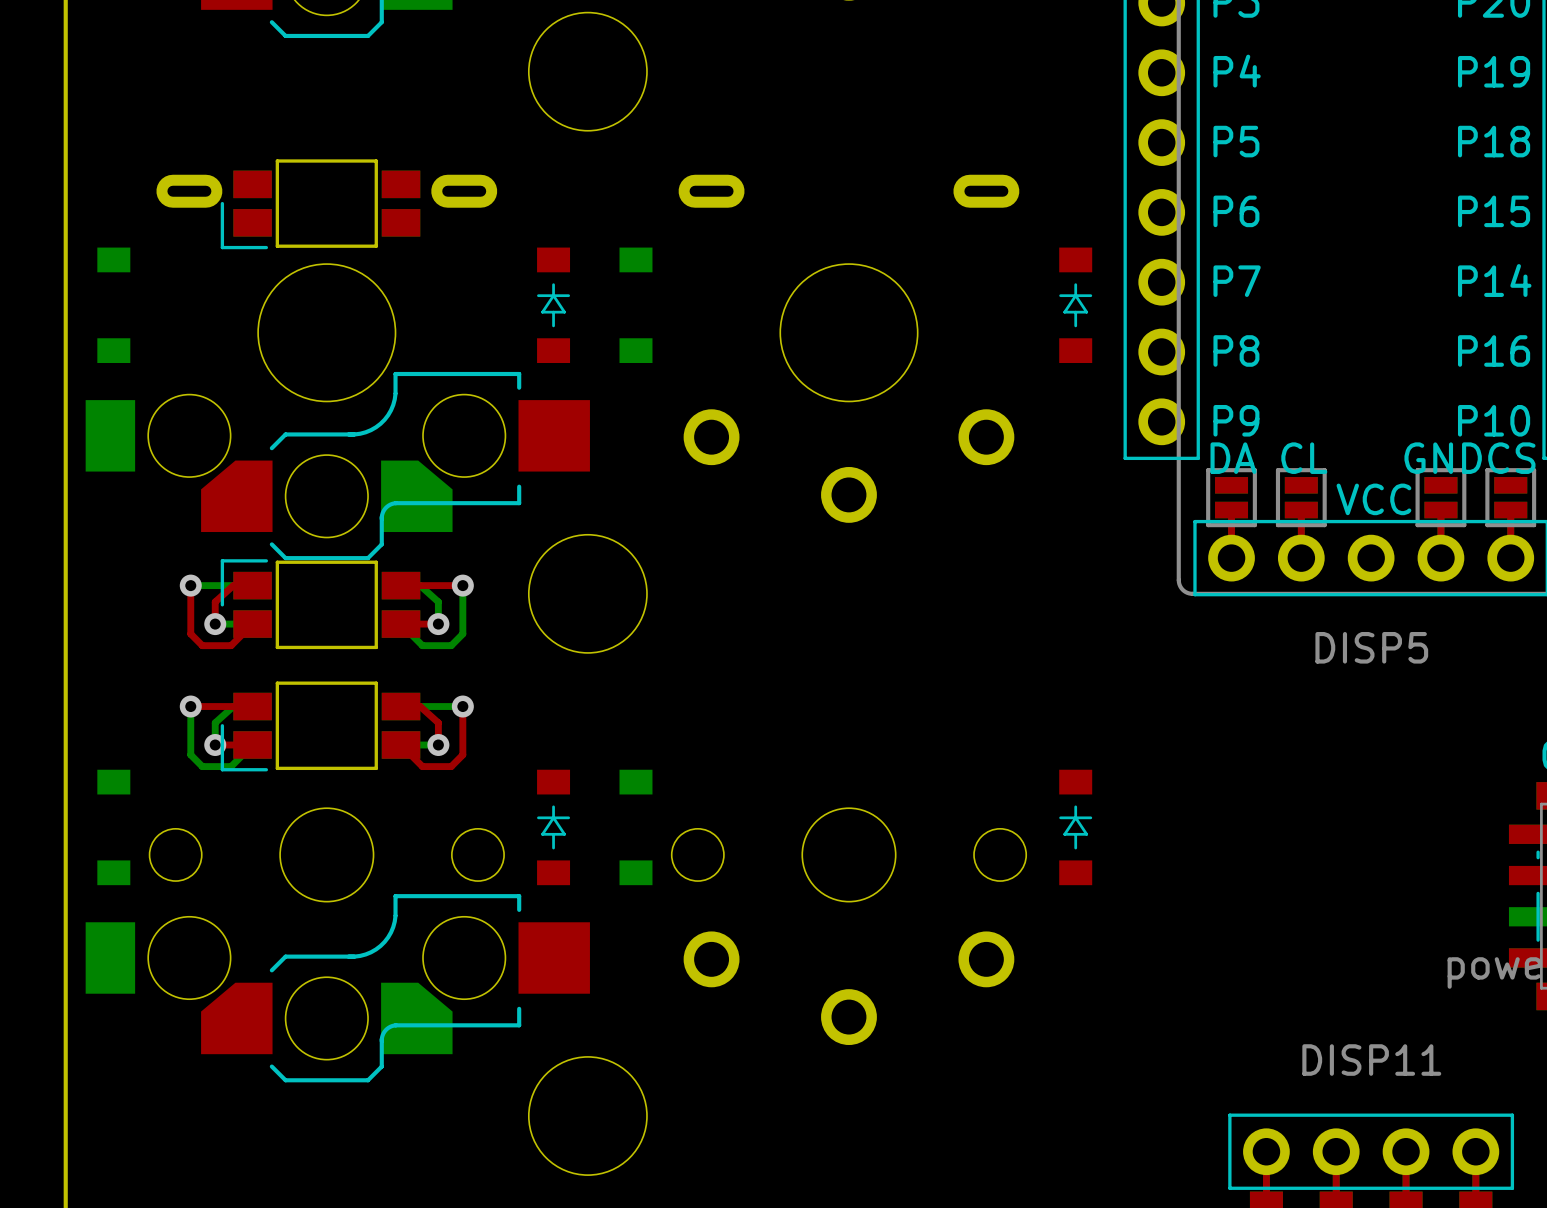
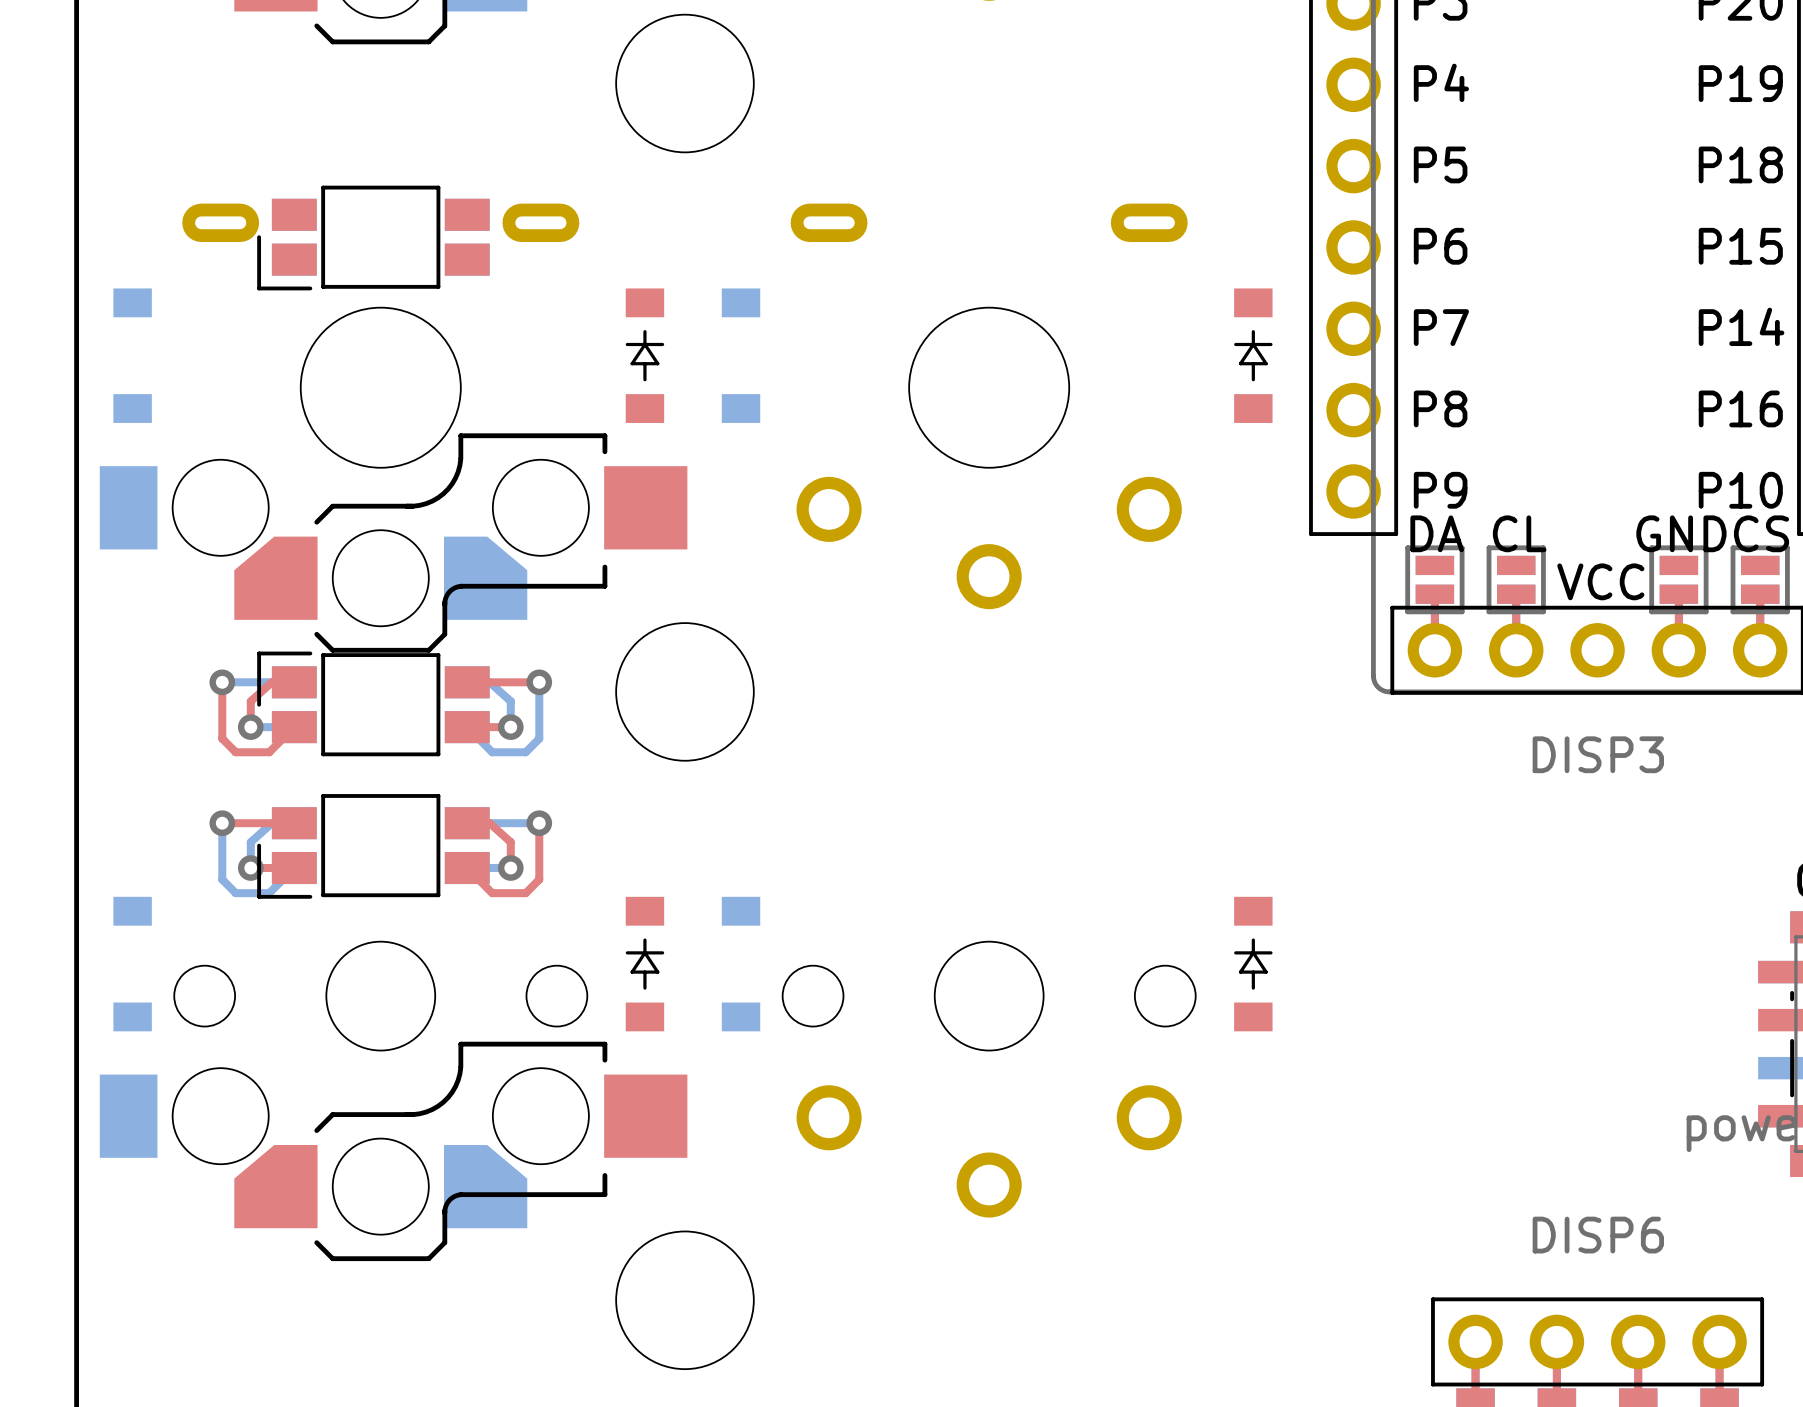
DISP5 name: DISP5 (1371, 647) -> DISP3 (1598, 754)
DISP11 name: DISP11 (1371, 1060) -> DISP6 (1598, 1235)

